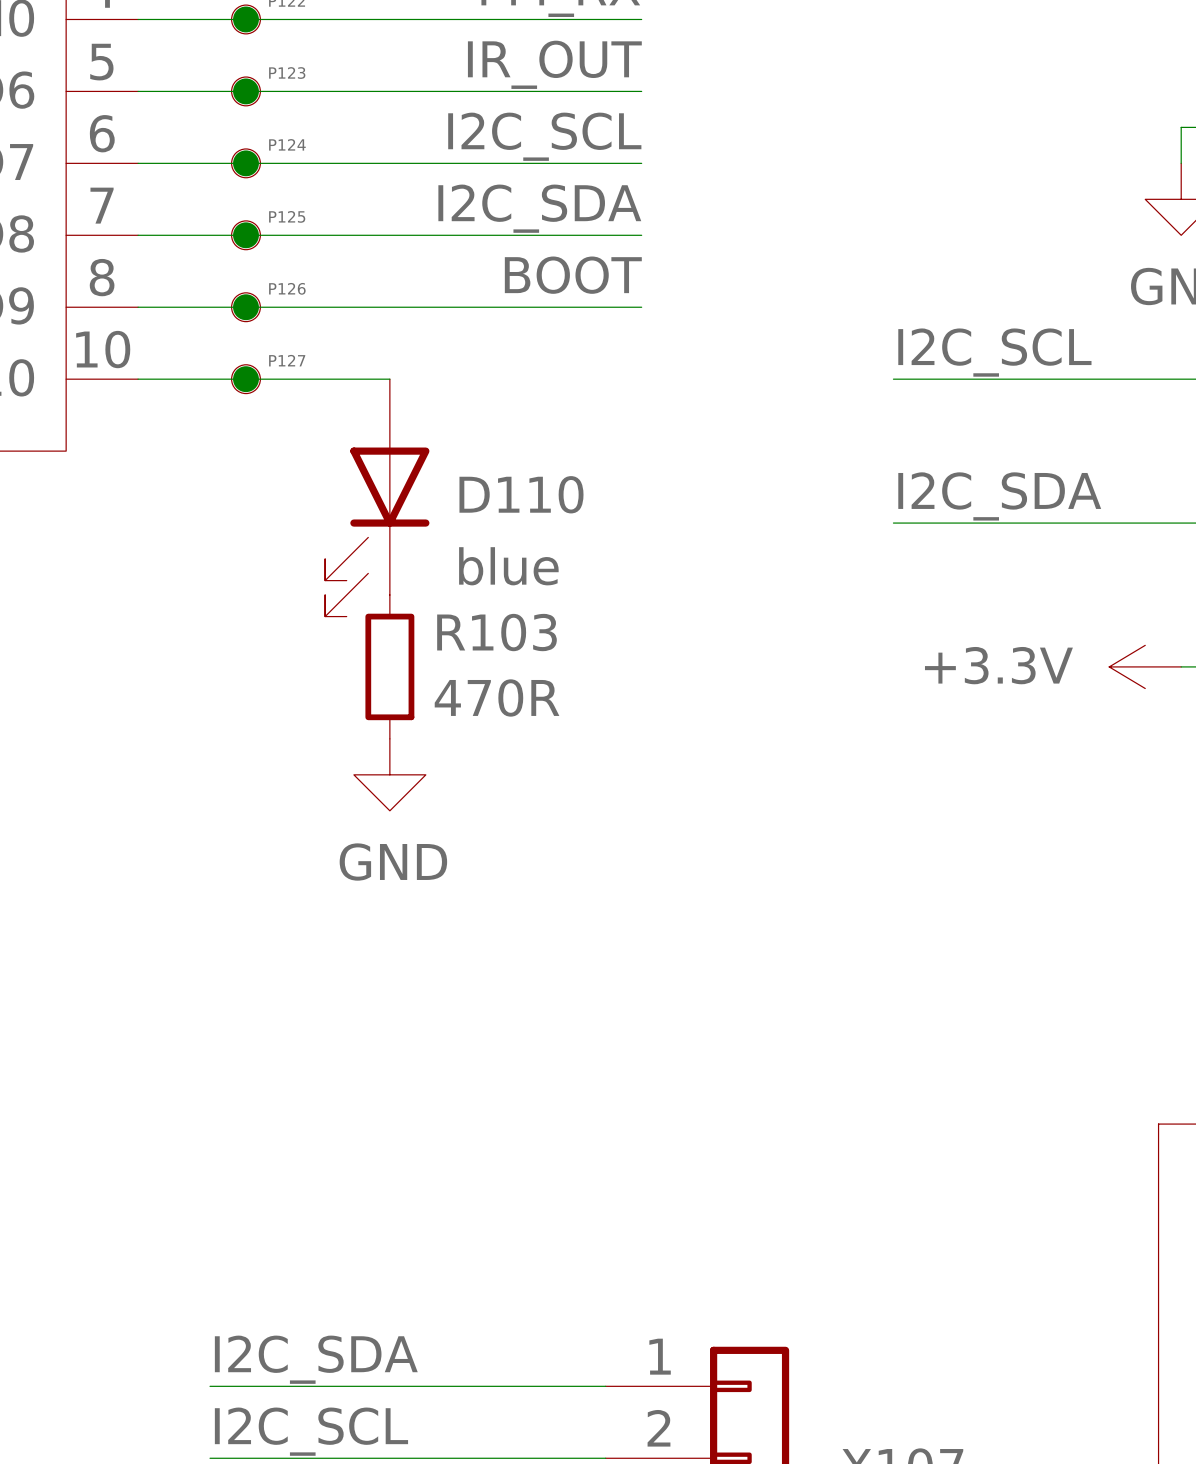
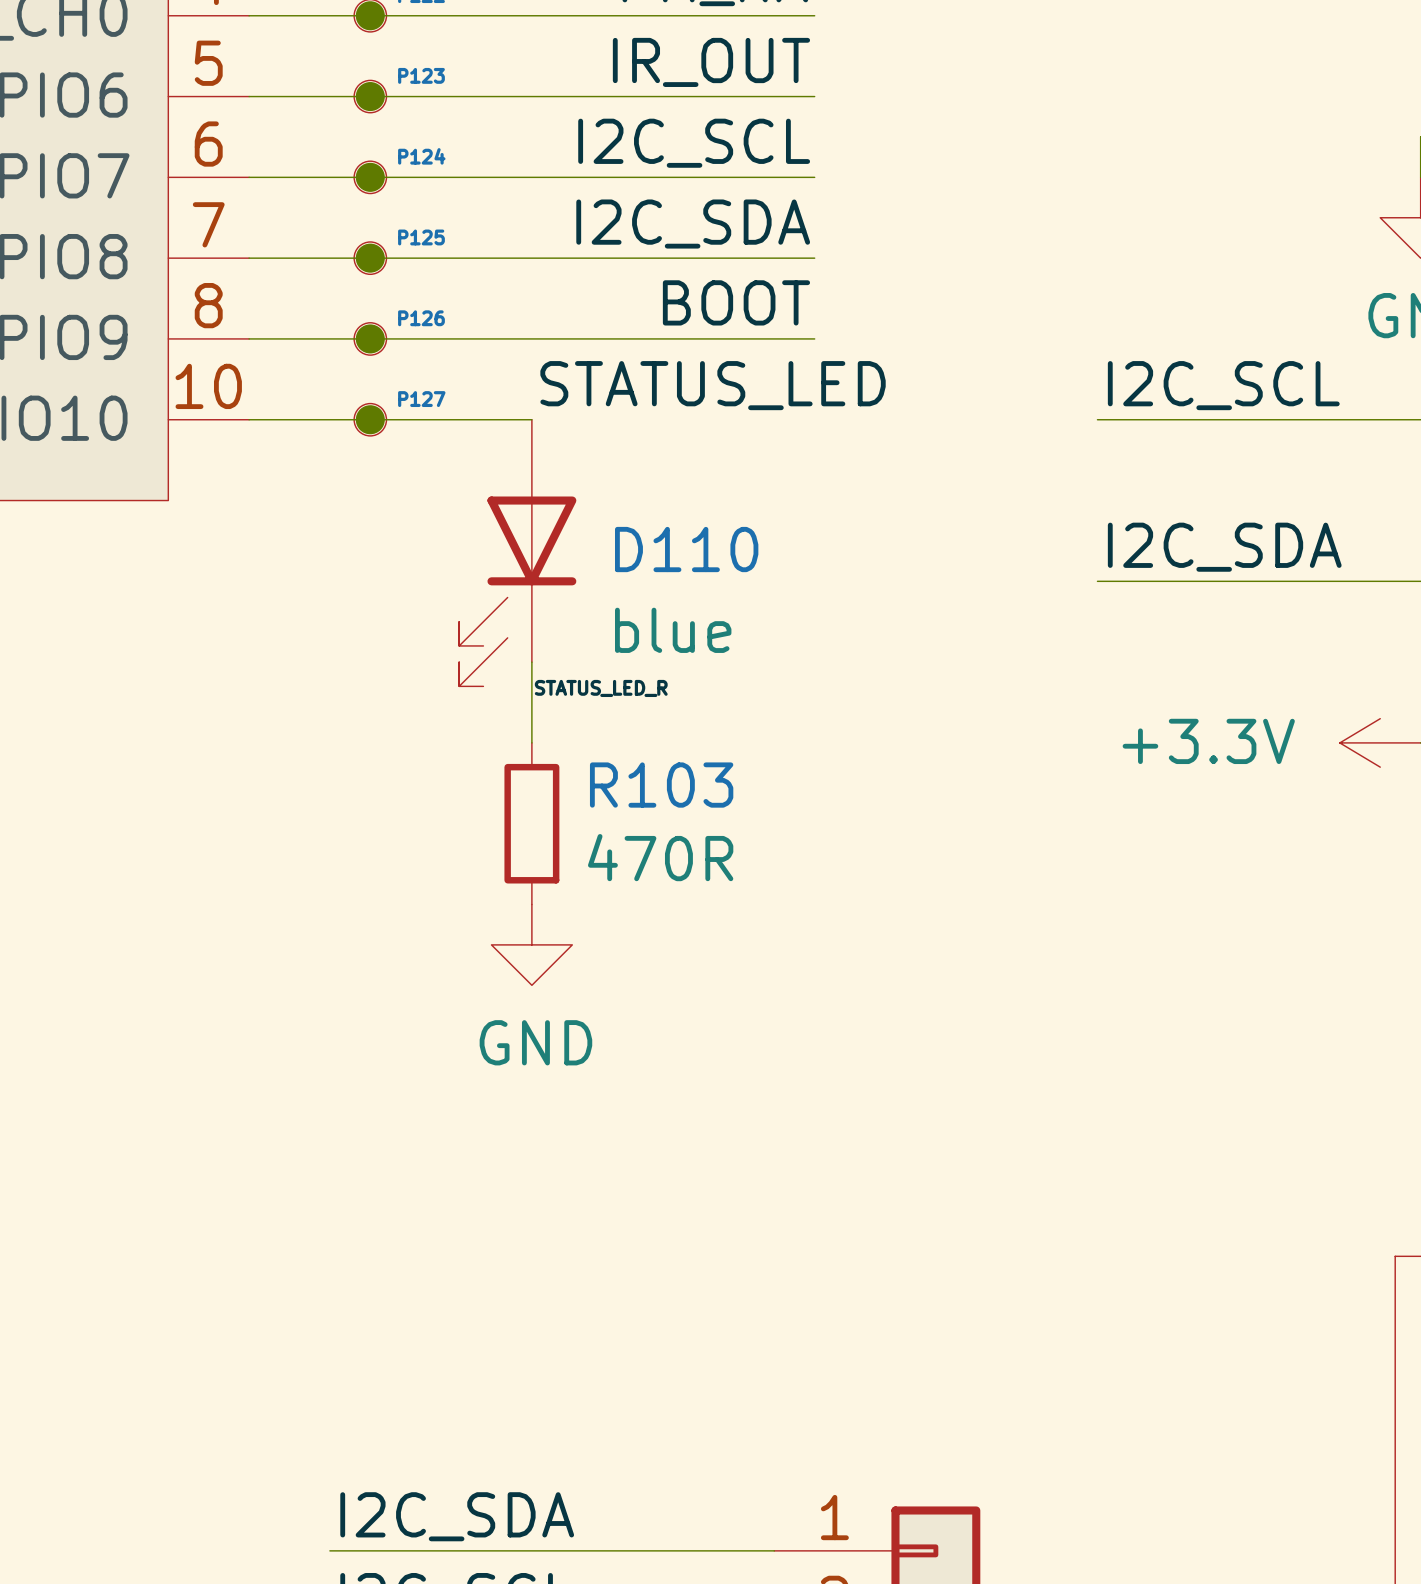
label: none -> STATUS_LED (713, 385)
wire: none -> (531, 662) (531, 742)
label: none -> STATUS_LED_R (601, 688)
R103 position: (389, 666) -> (531, 823)
power symbol position: GND (389, 774) -> GND (531, 944)

